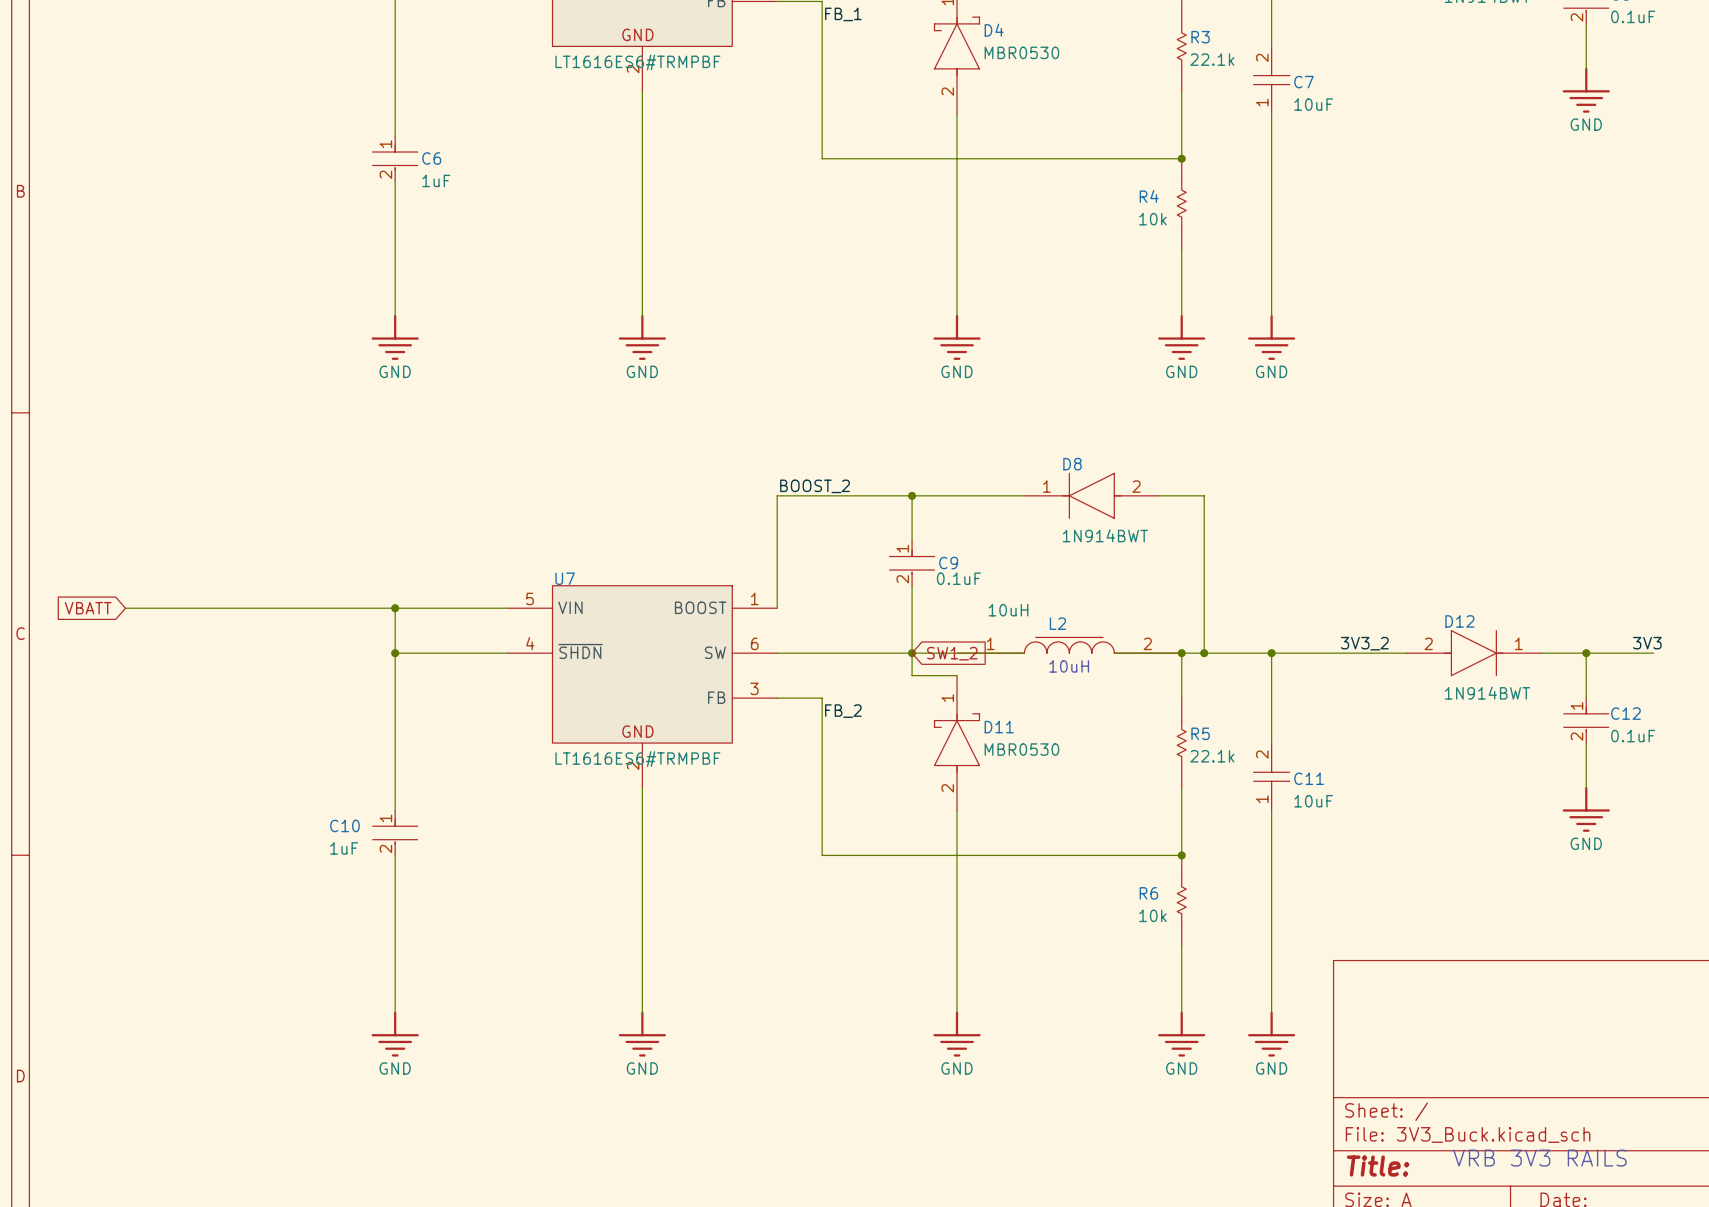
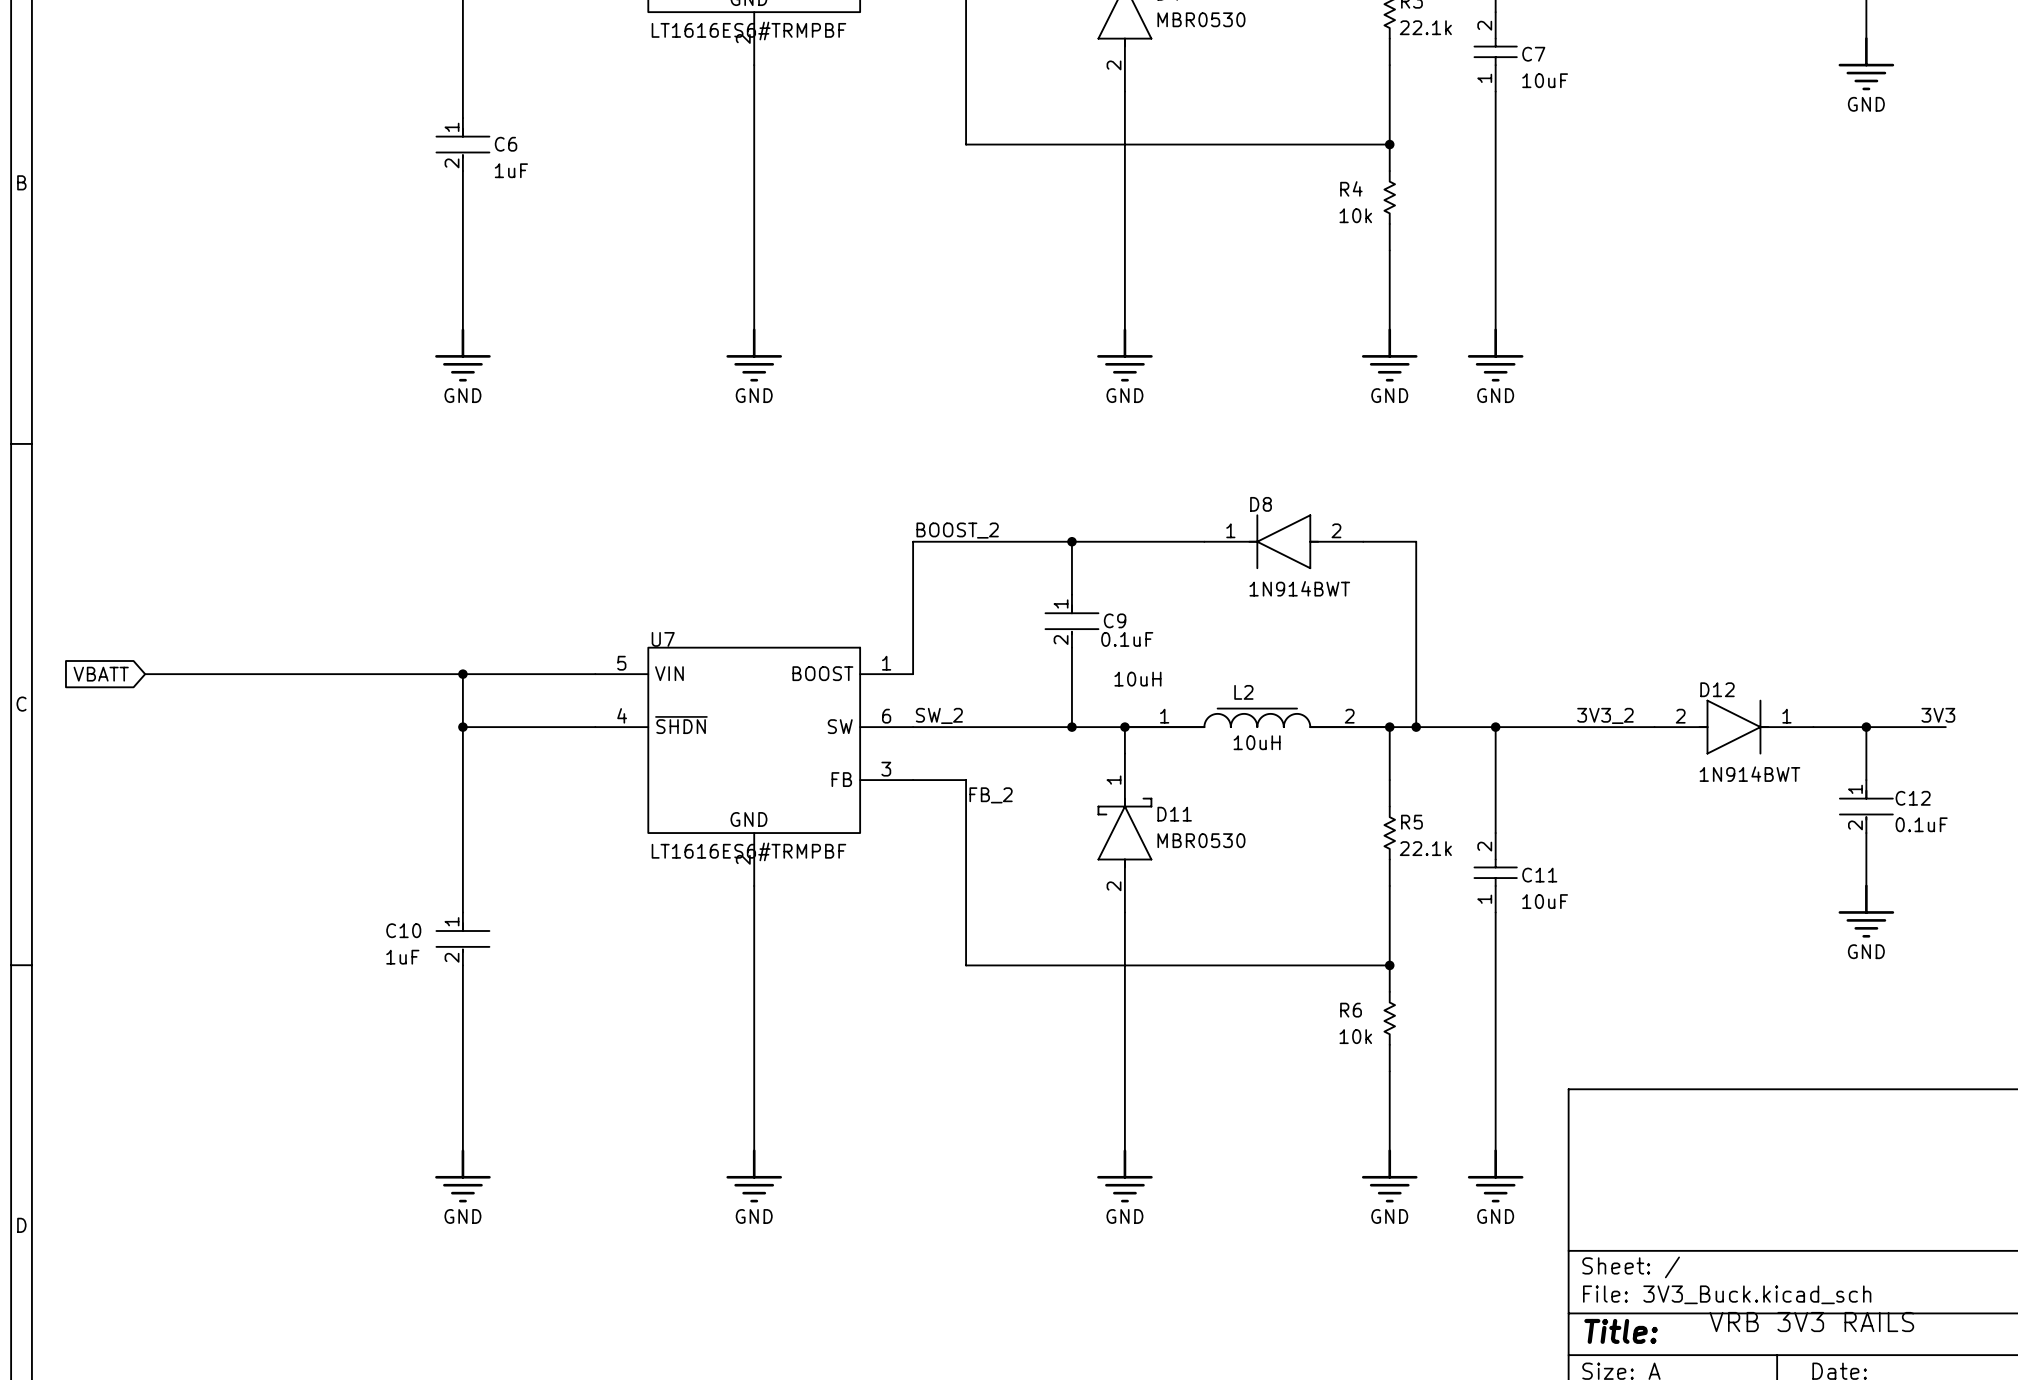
L2 text position: 10uH (1008, 610) -> 10uH (1137, 679)
label: none -> SW_2 (939, 715)
wire: (912, 653) (912, 675) (957, 675) -> (1124, 727) (1124, 753)
global label: SW1_2 (952, 653) -> none
junction: none -> (1124, 727)

